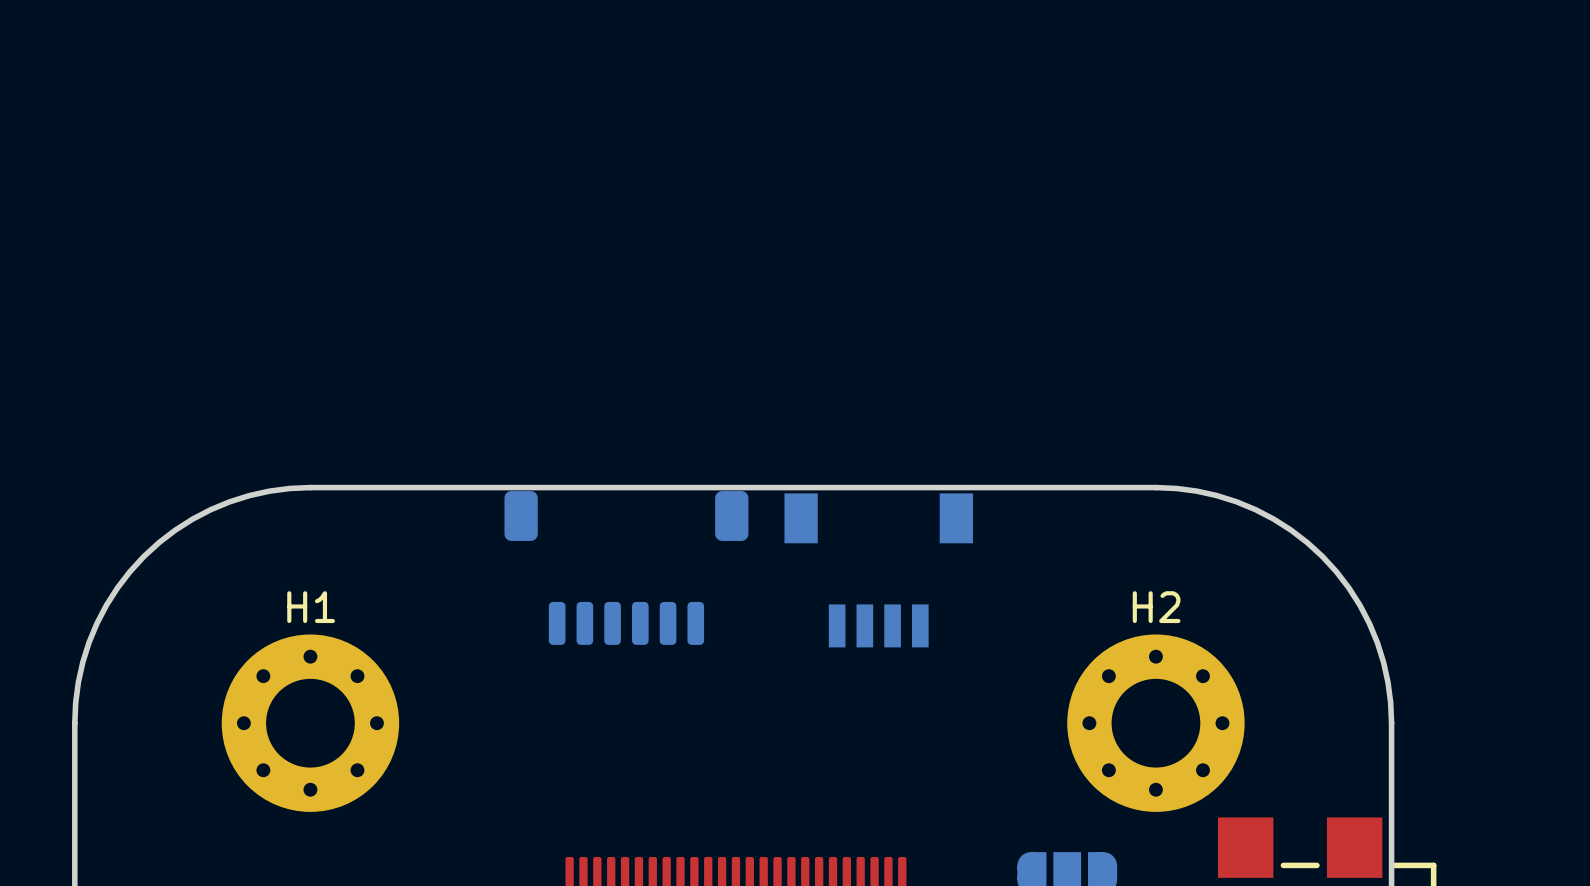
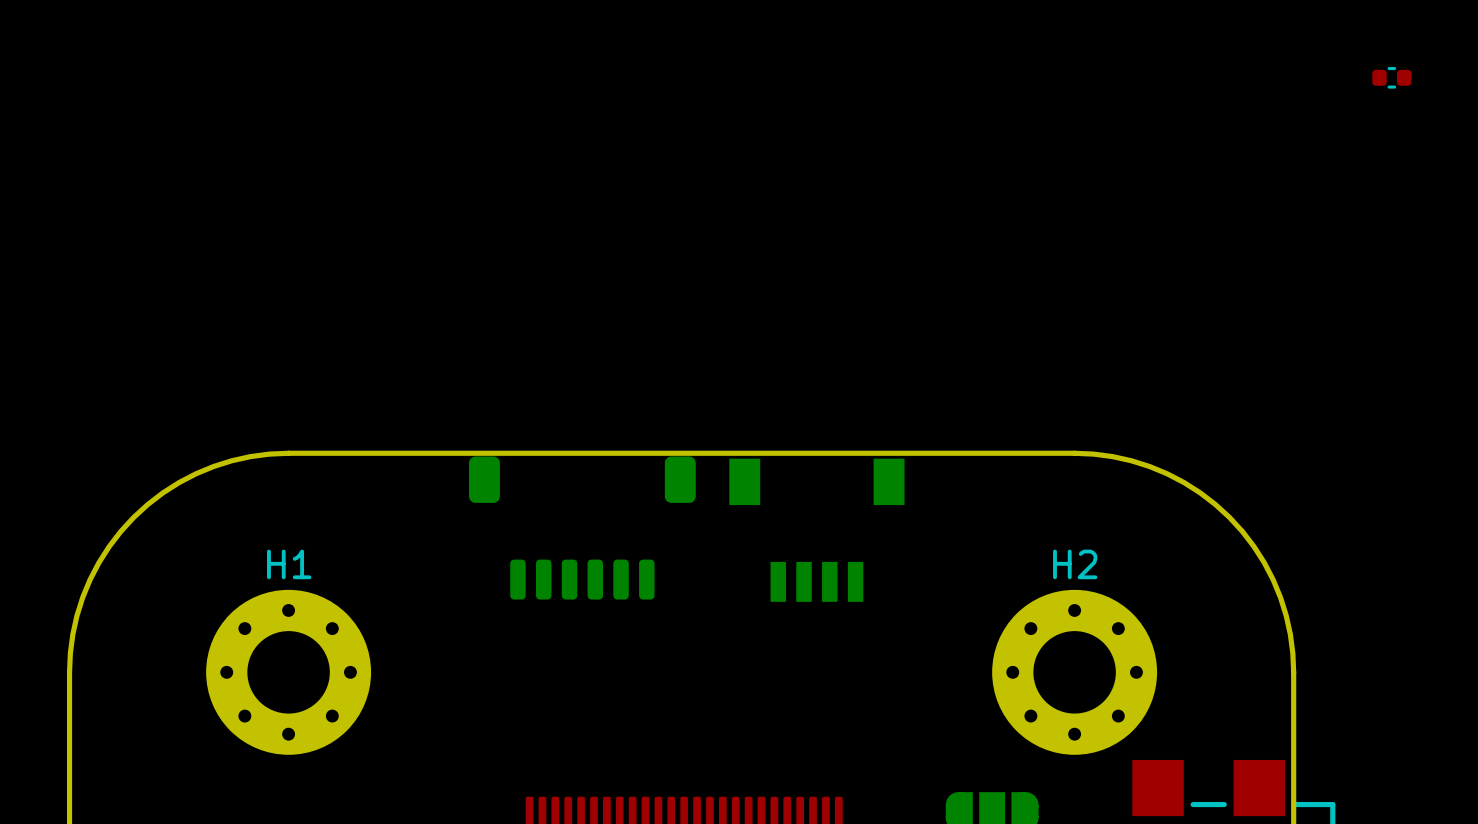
part: none -> (1391, 77)

